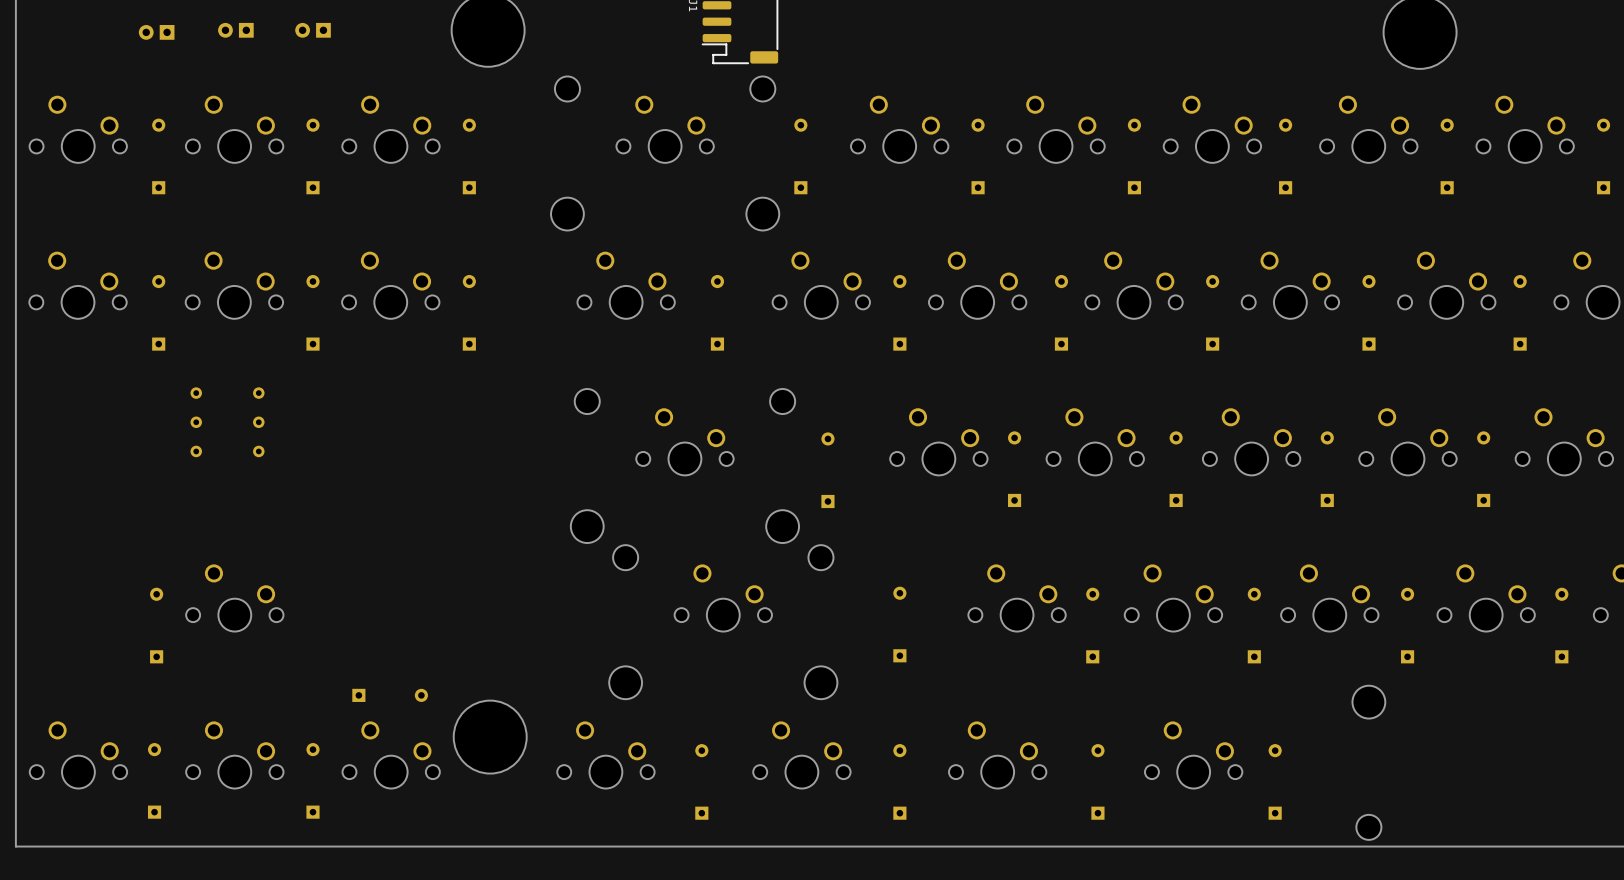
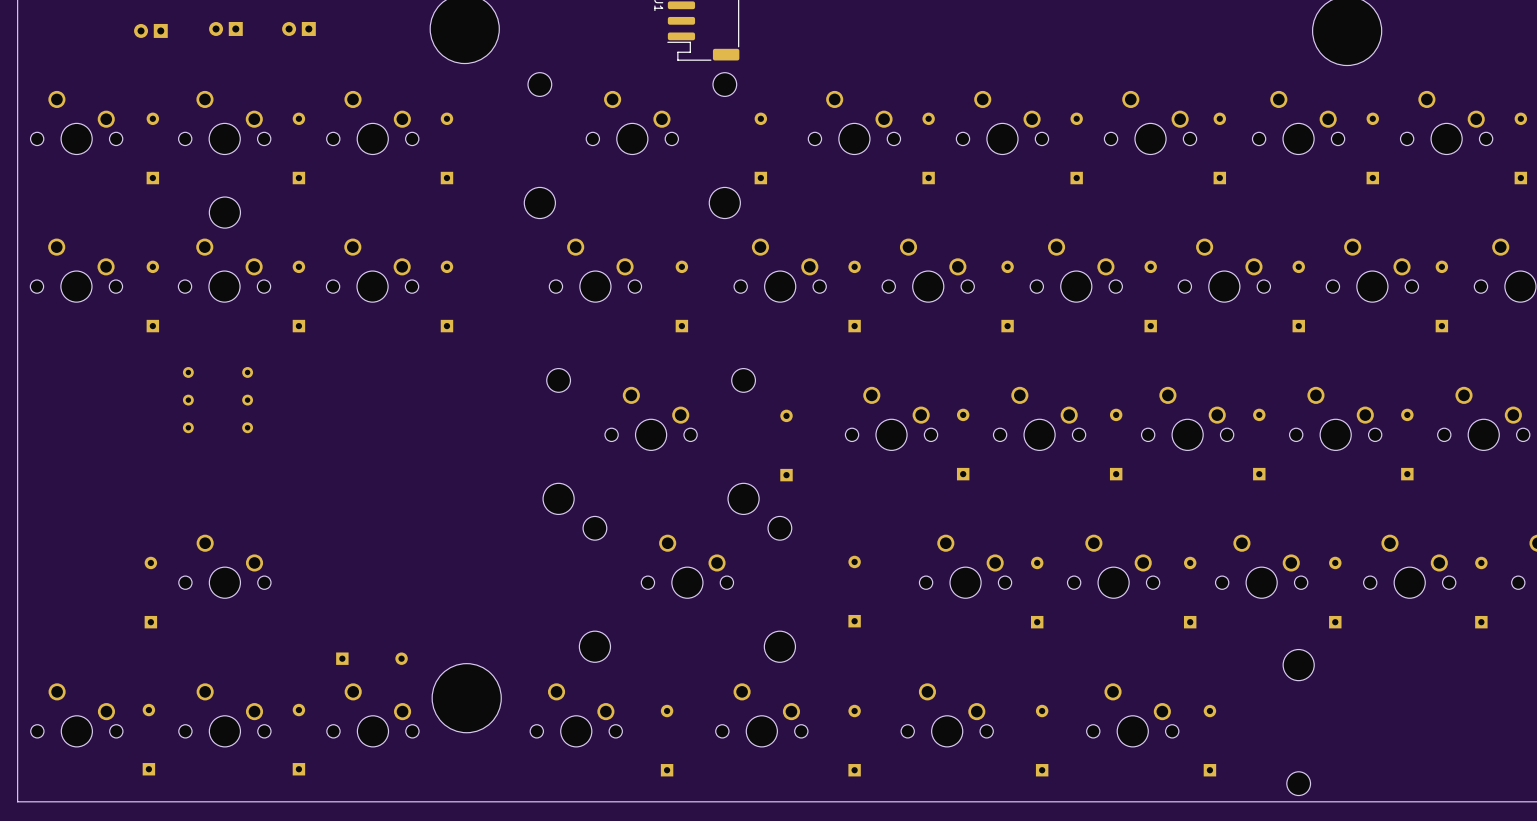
part: none -> (224, 212)

